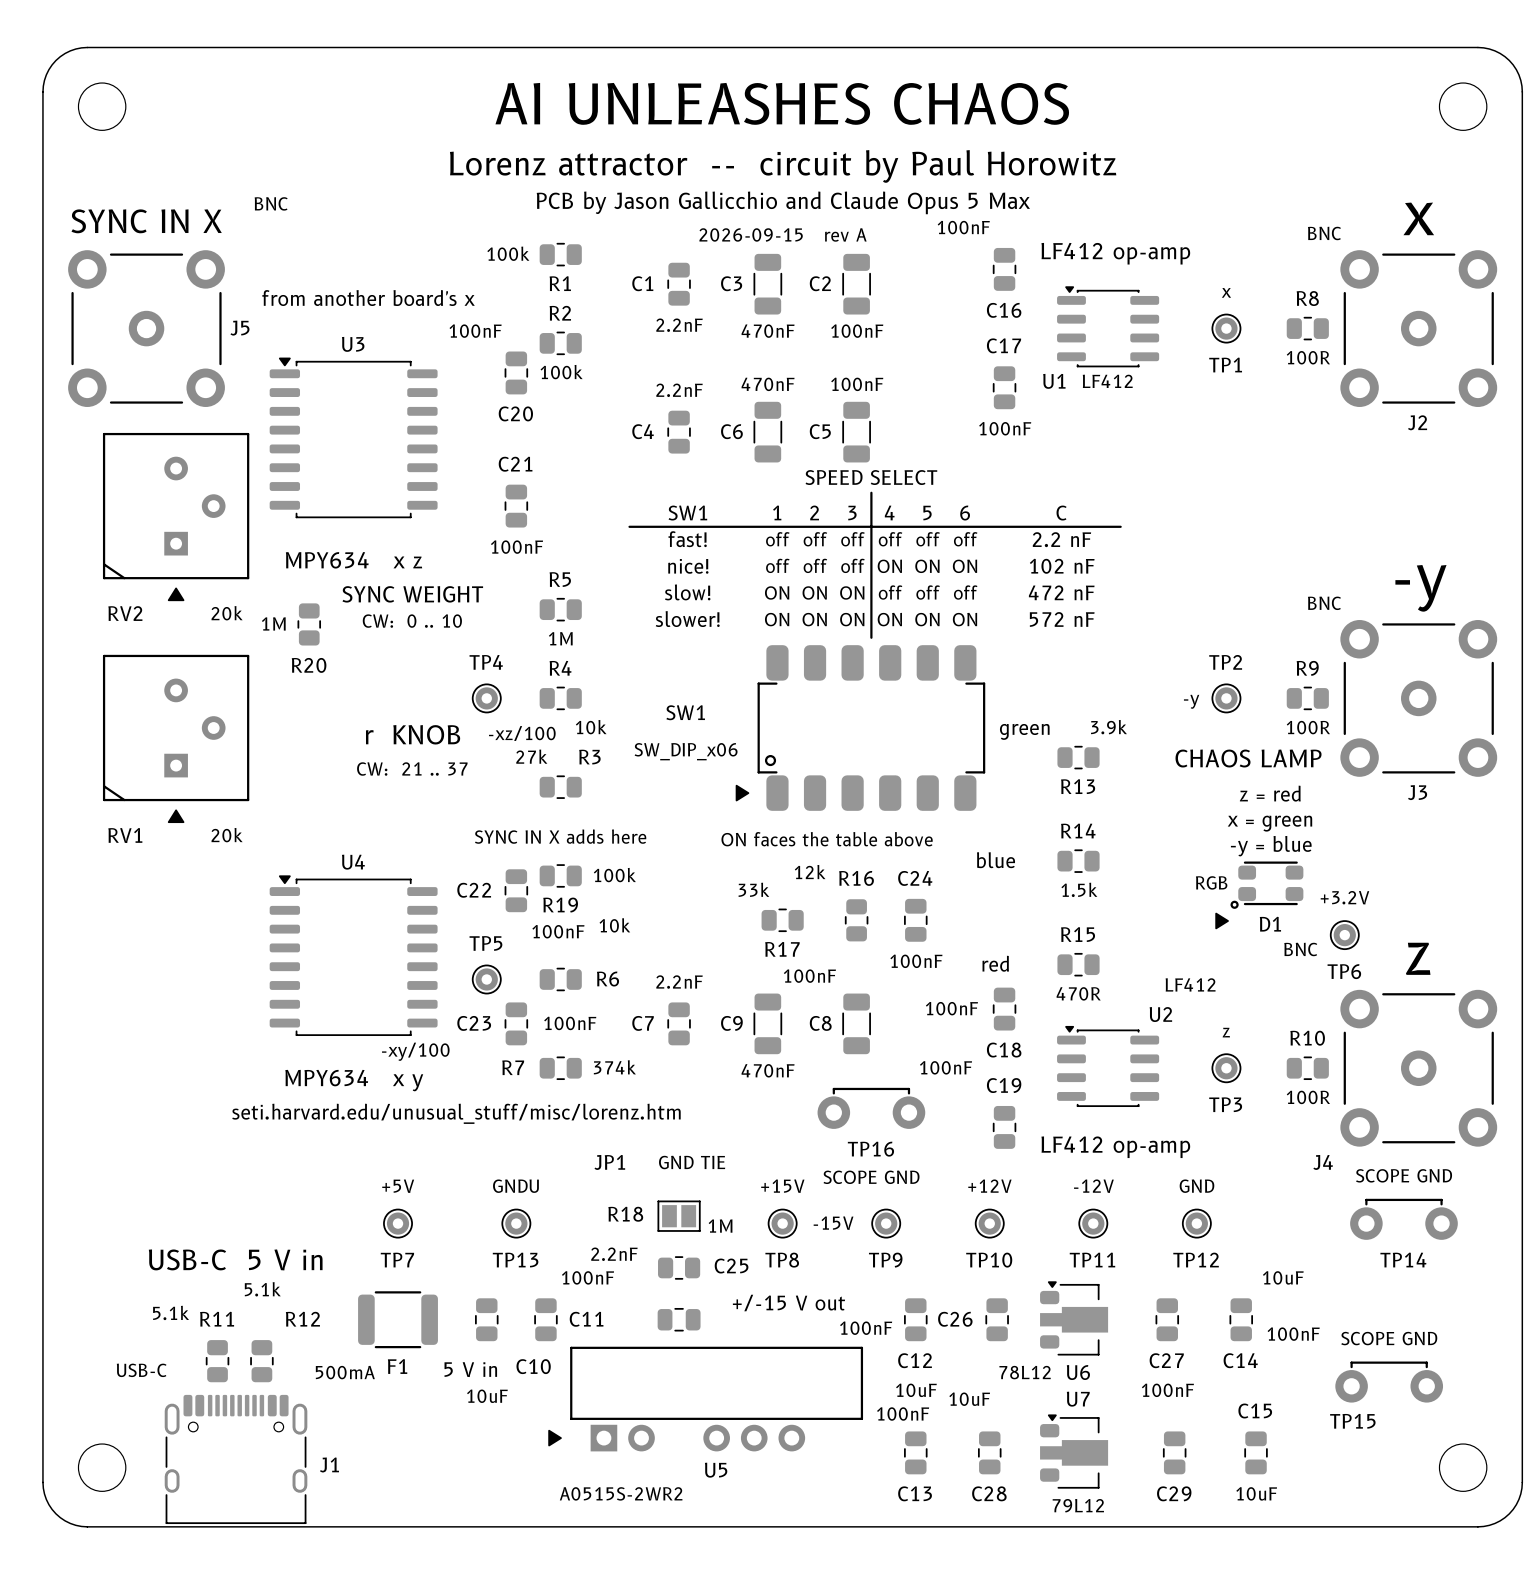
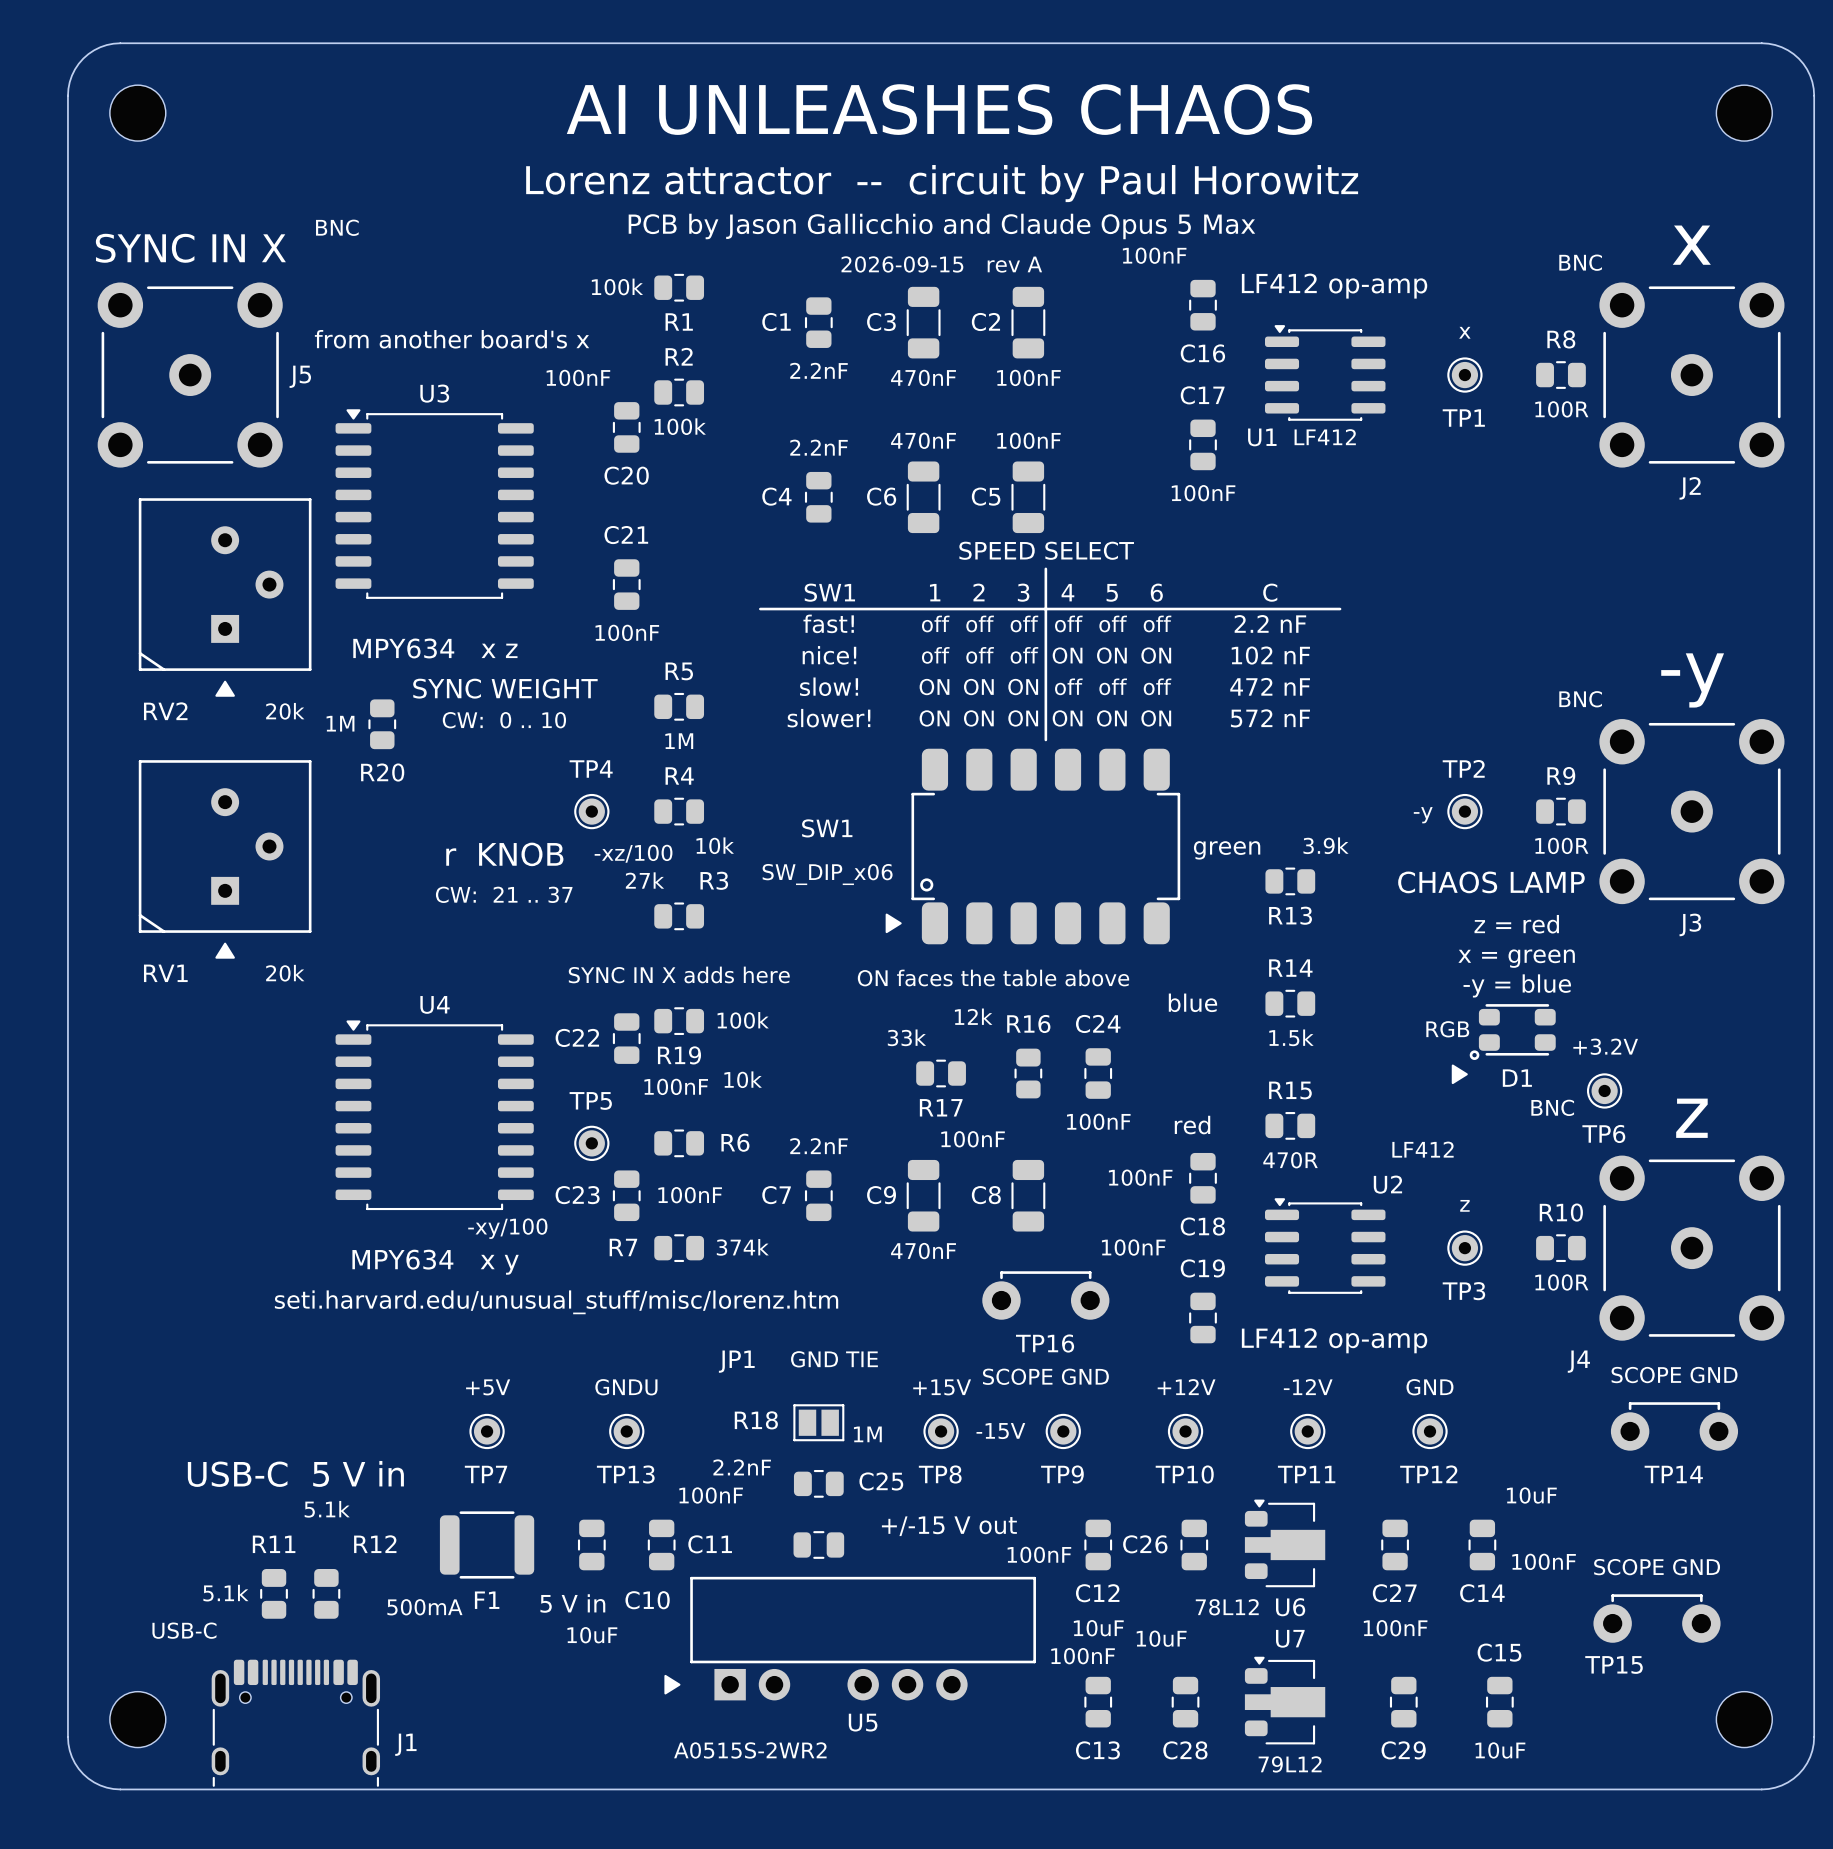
R11 value position: 5.1k (171, 1312) -> 5.1k (225, 1593)
J1 footprint: [164, 1394, 308, 1525] -> [211, 1659, 381, 1787]

